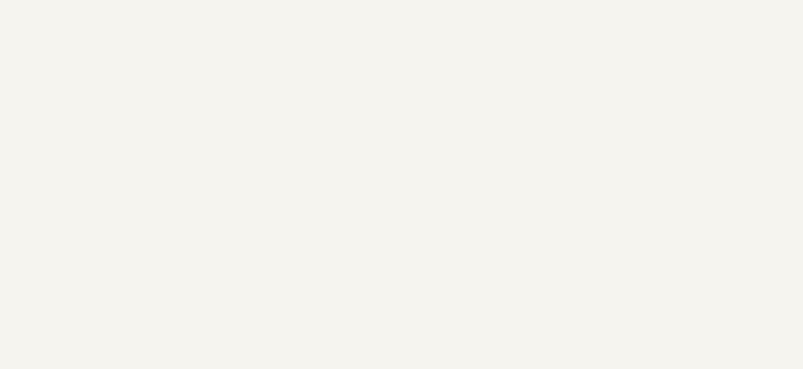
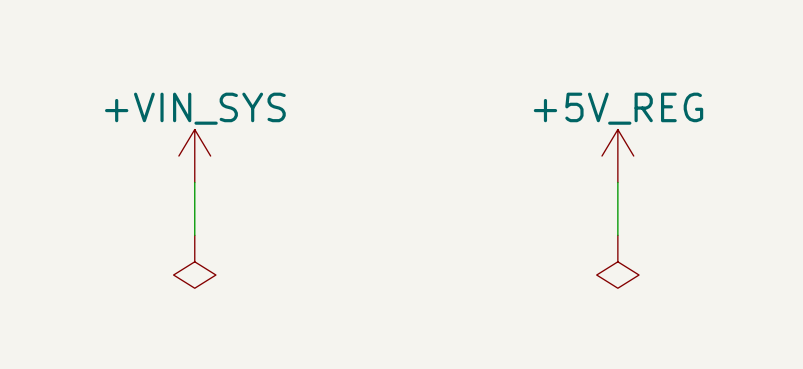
power symbol: none -> +VIN_SYS (194, 156)
power symbol: none -> +5V_REG (617, 156)
wire: none -> (194, 182) (194, 235)
wire: none -> (617, 182) (617, 235)
power symbol: none -> (194, 261)
power symbol: none -> (617, 261)

